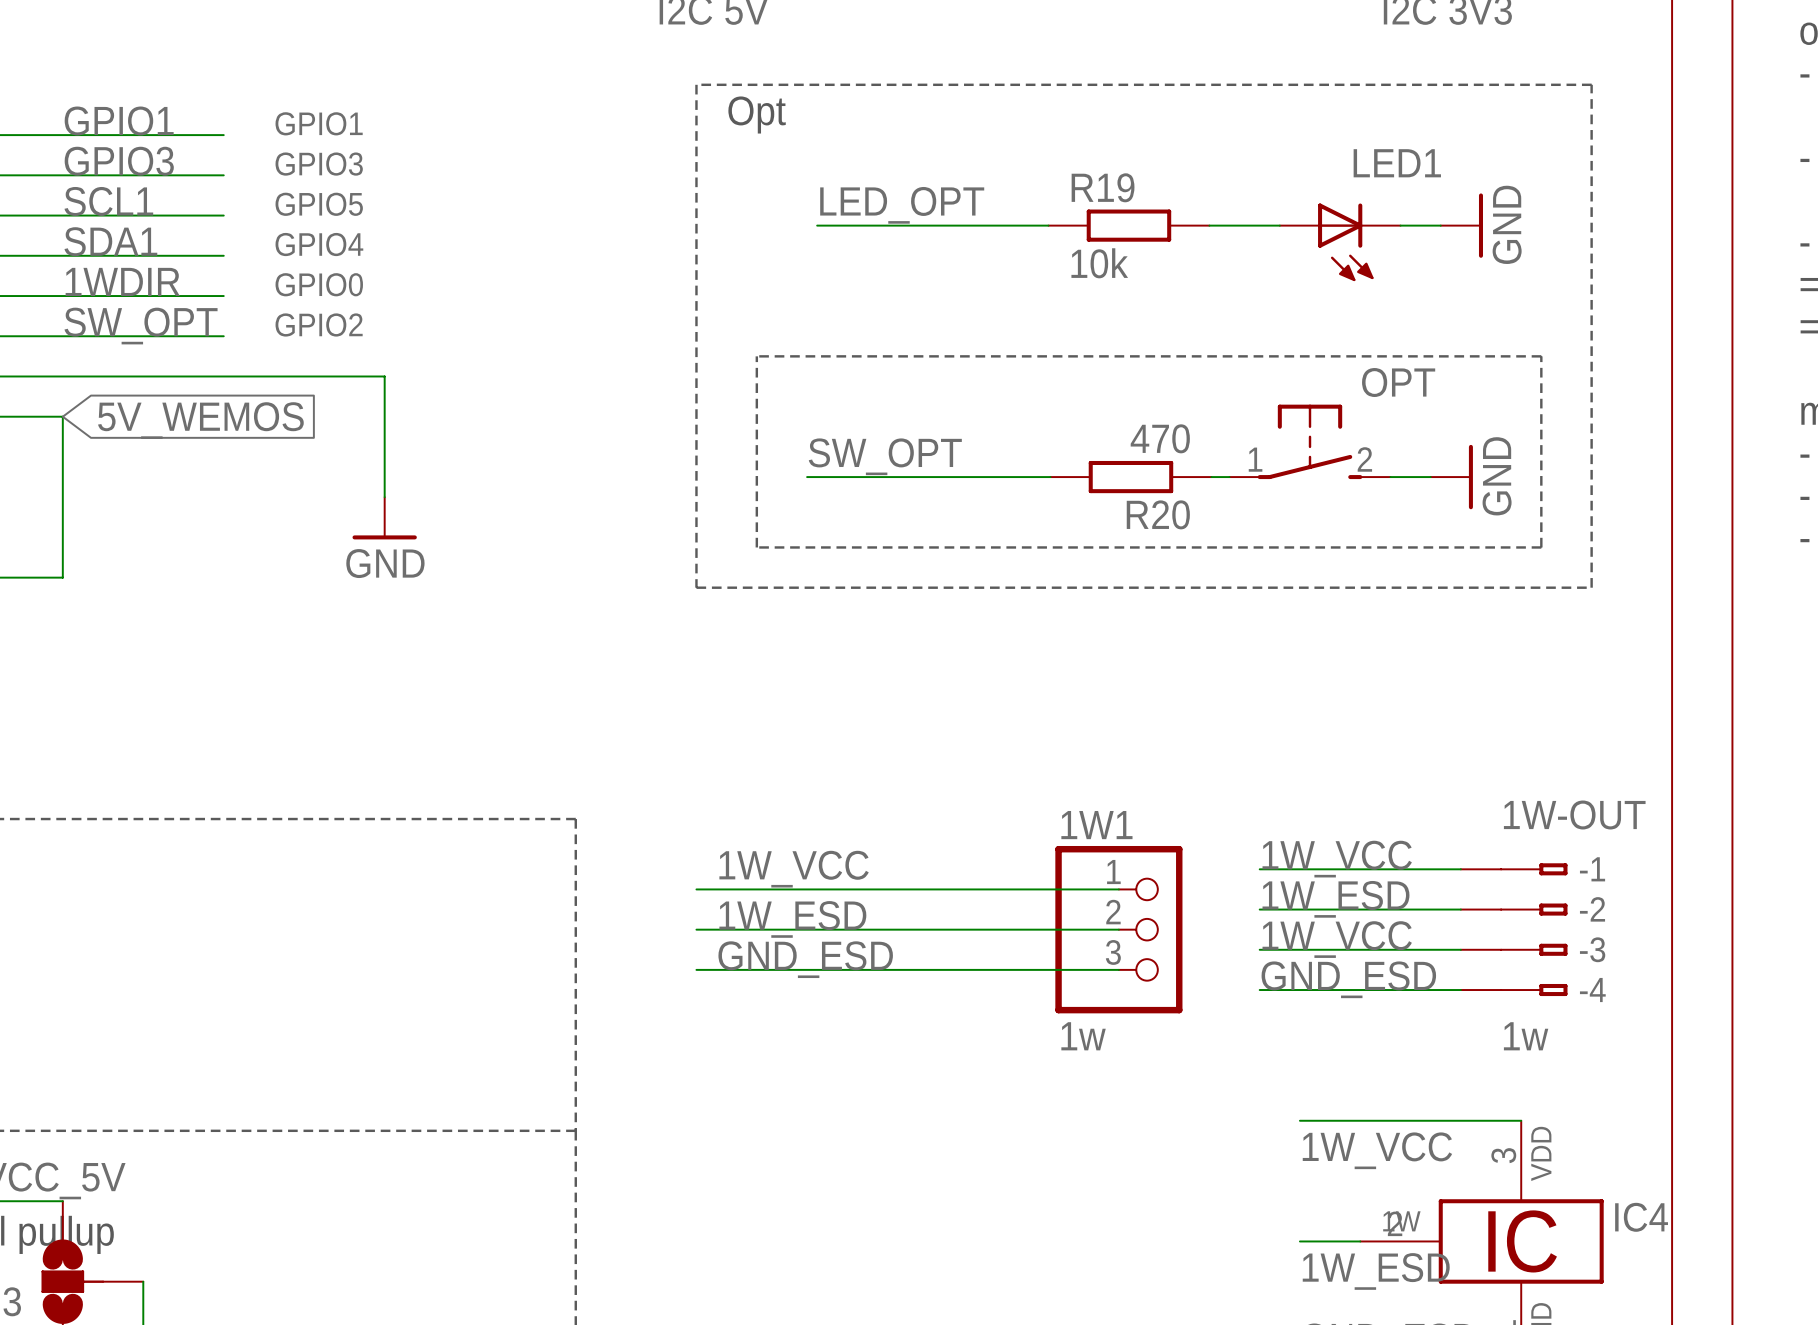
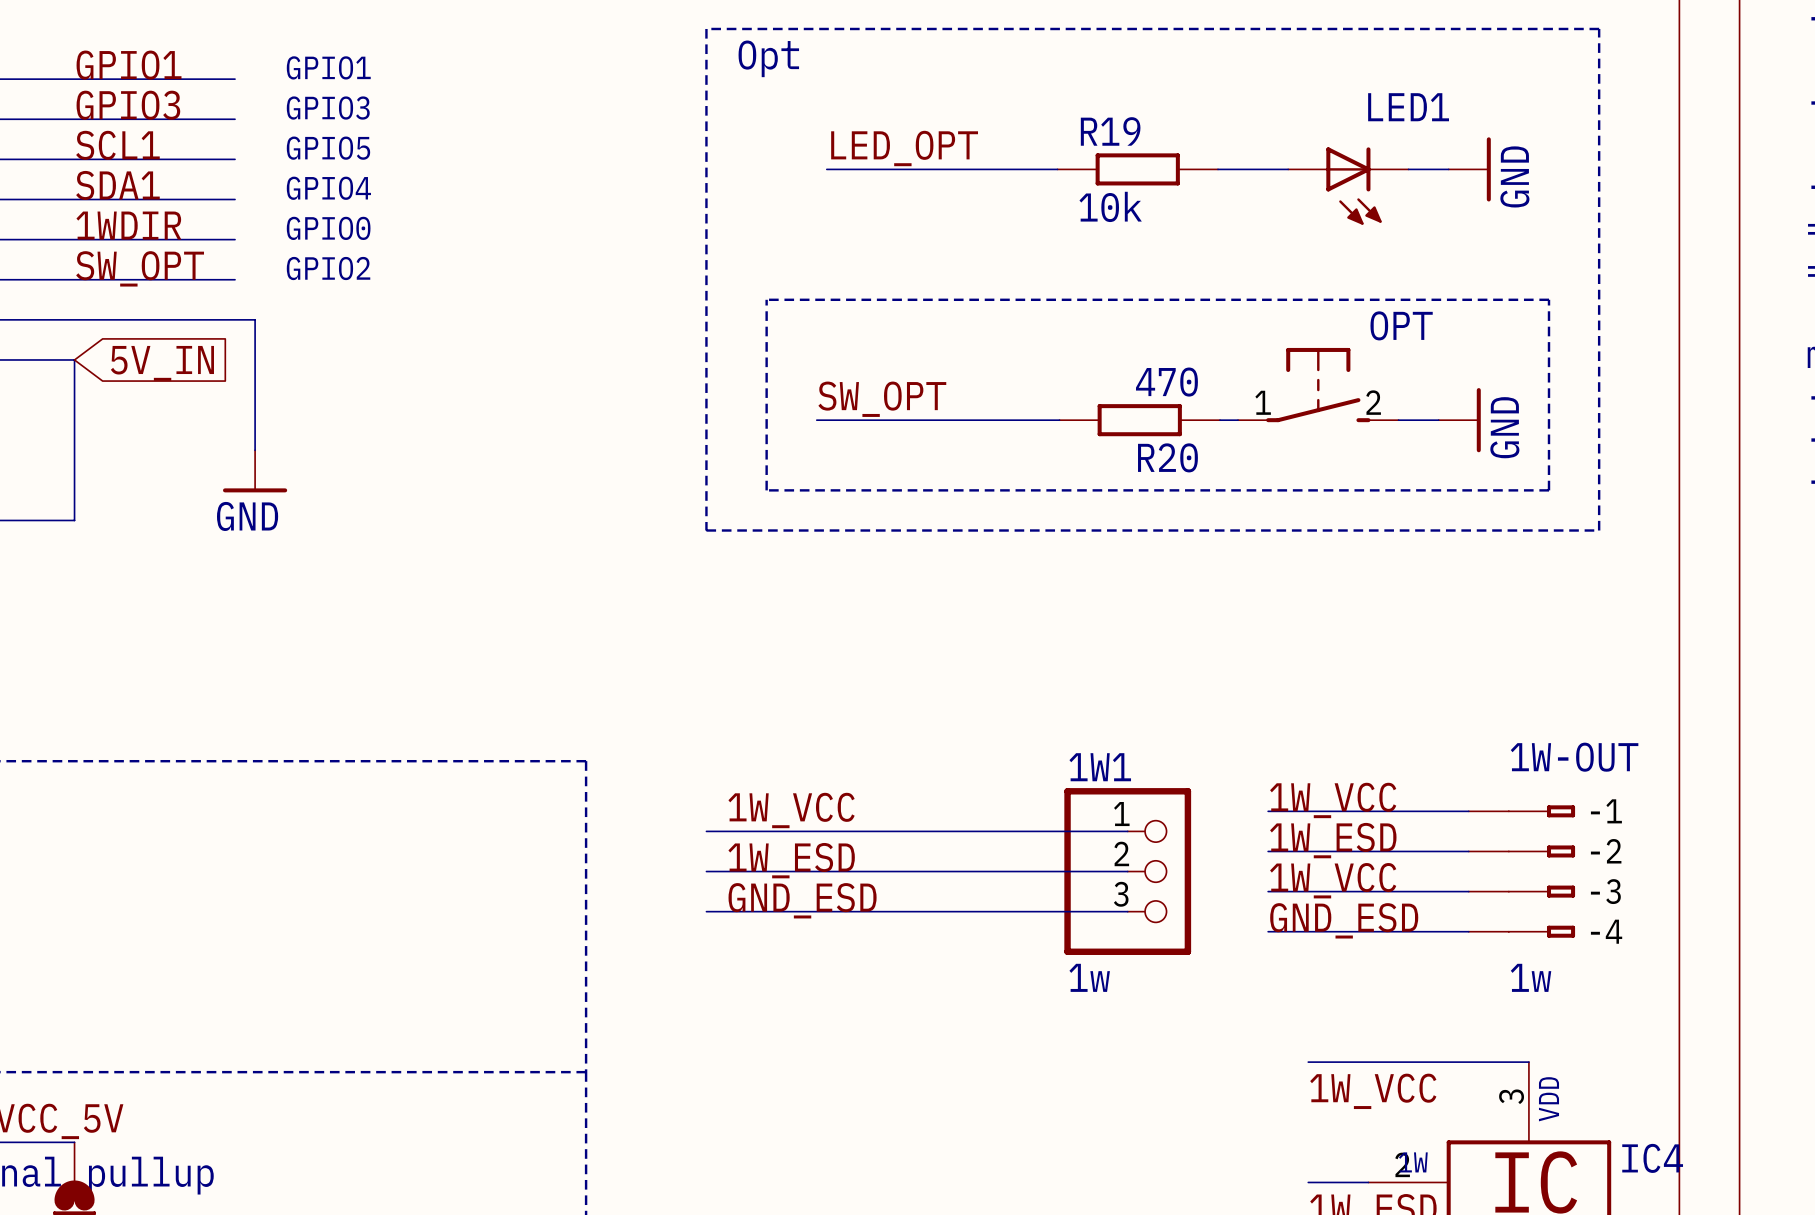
wire: (243, 376) (384, 376) (384, 497) -> (255, 319) (255, 450)
global label: 5V_WEMOS (200, 420) -> 5V_IN (162, 363)
power symbol position: GND (384, 518) -> GND (255, 471)

